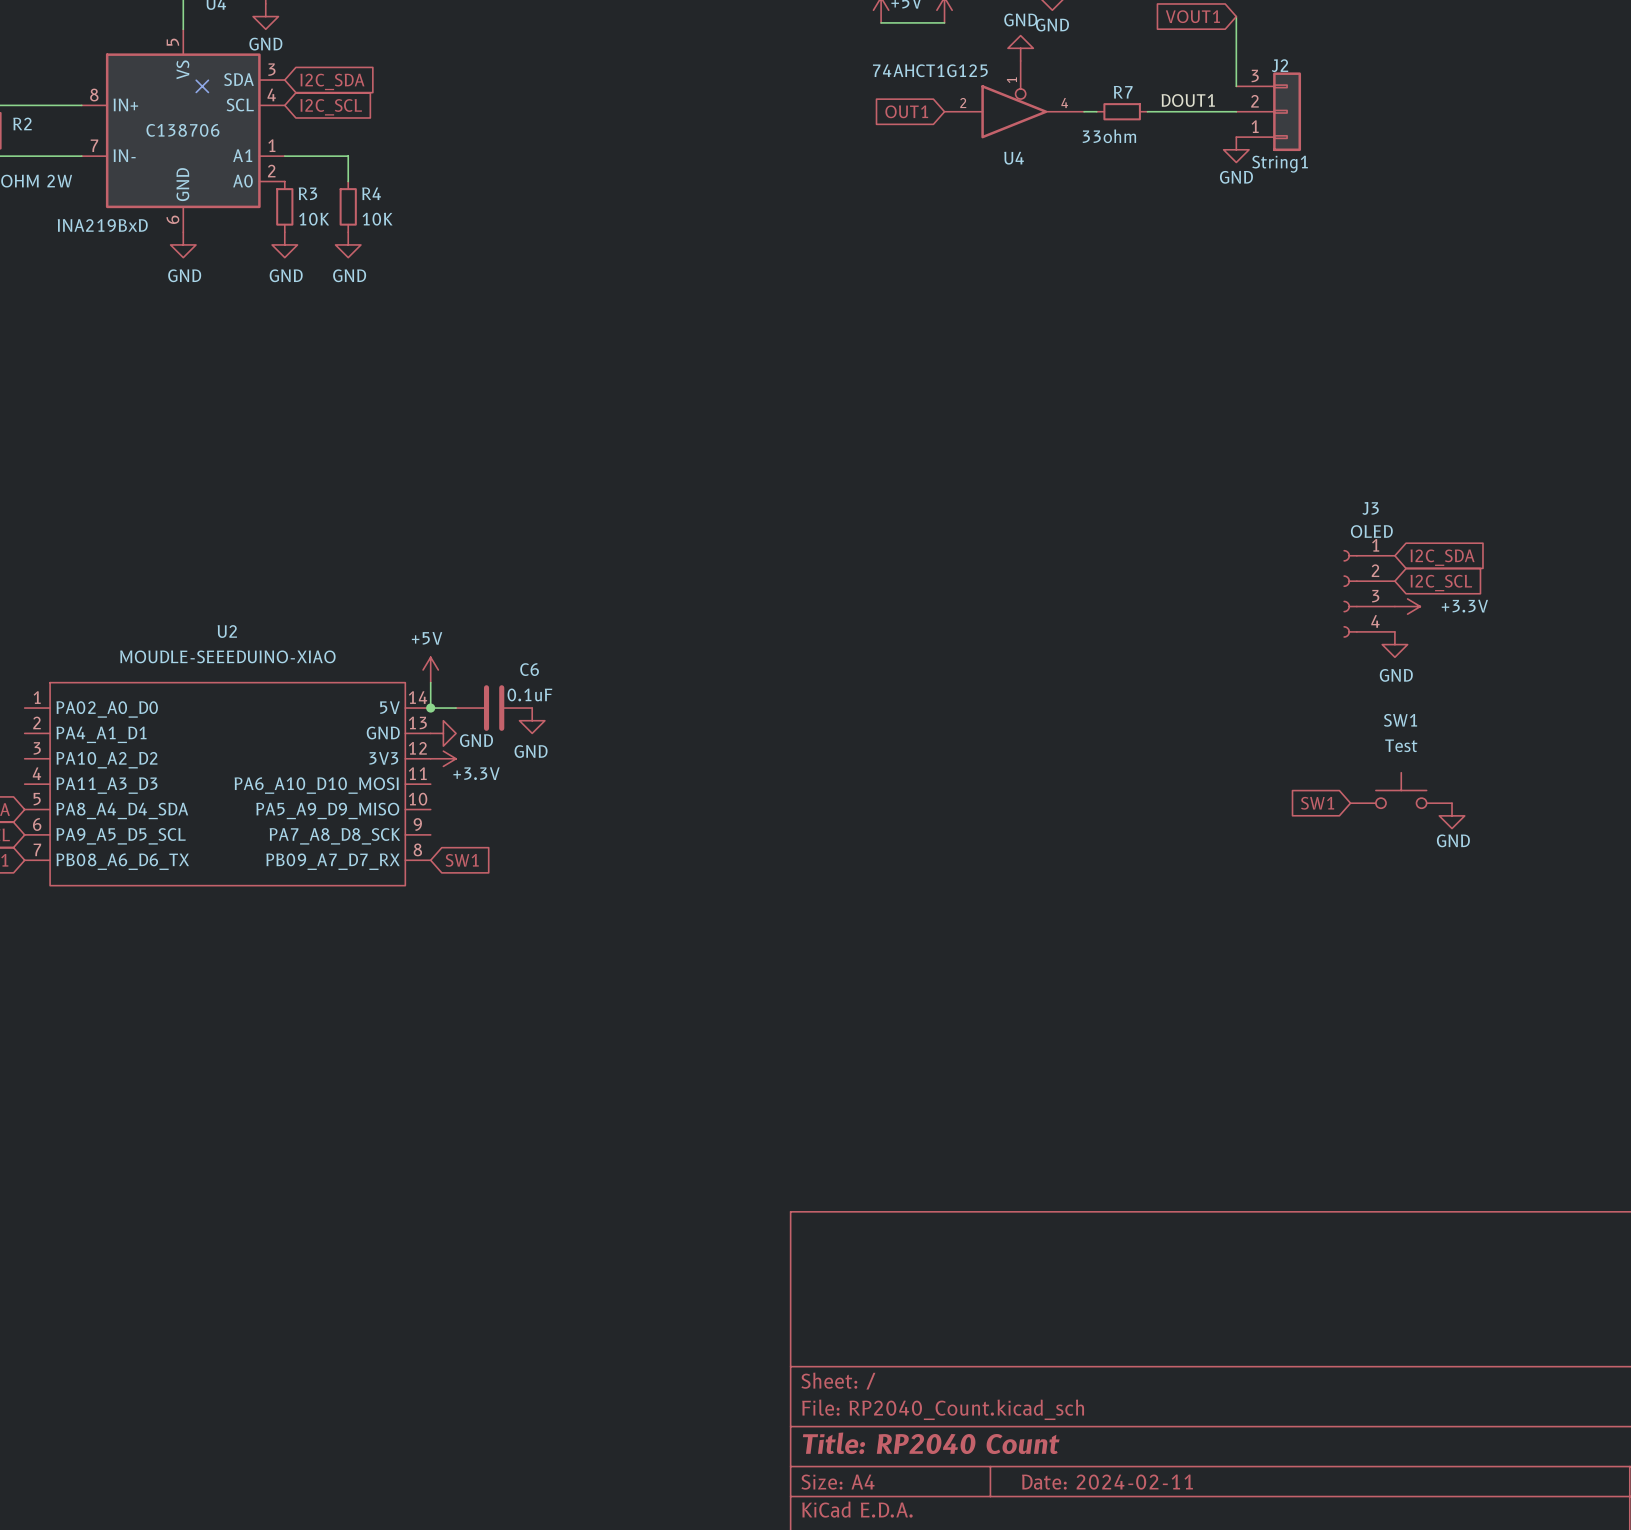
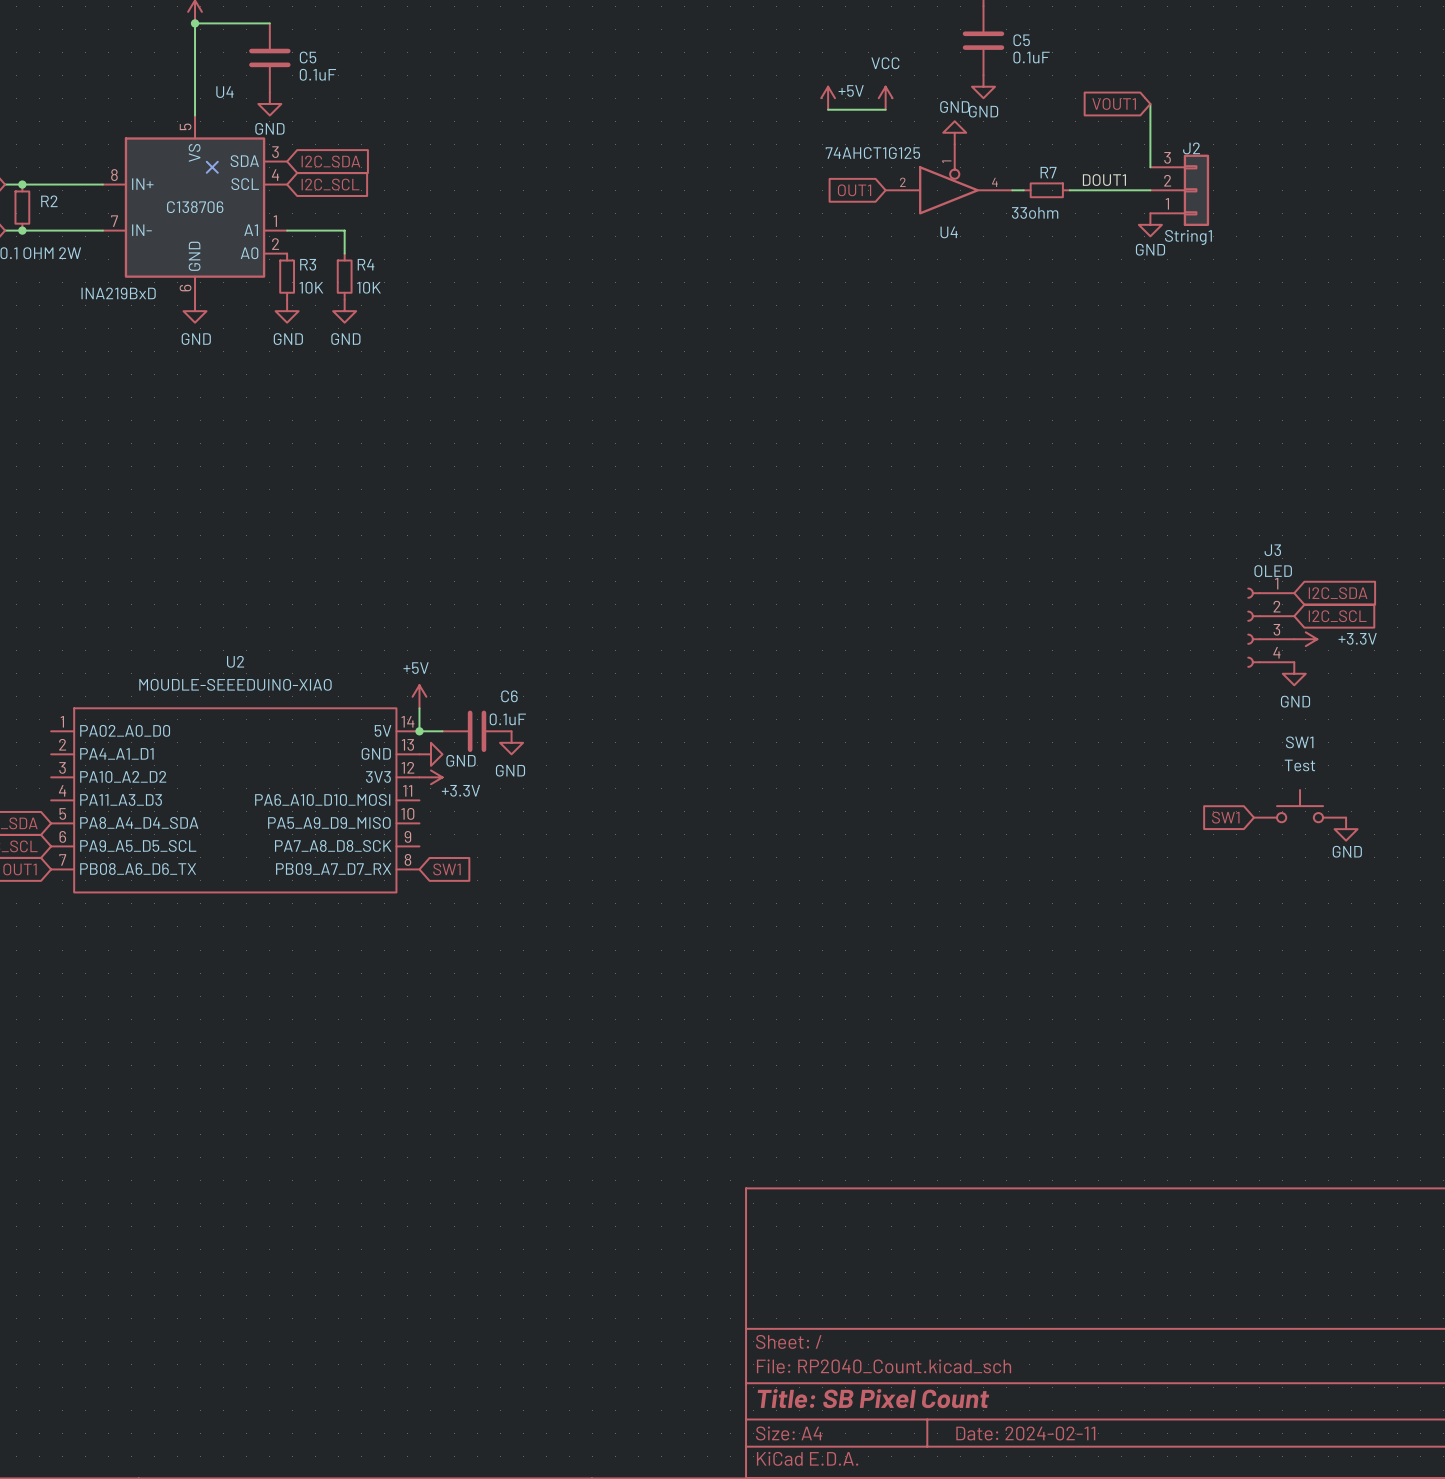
title block: Title: RP2040 Count (931, 1443) -> Title: SB Pixel Count (873, 1398)

